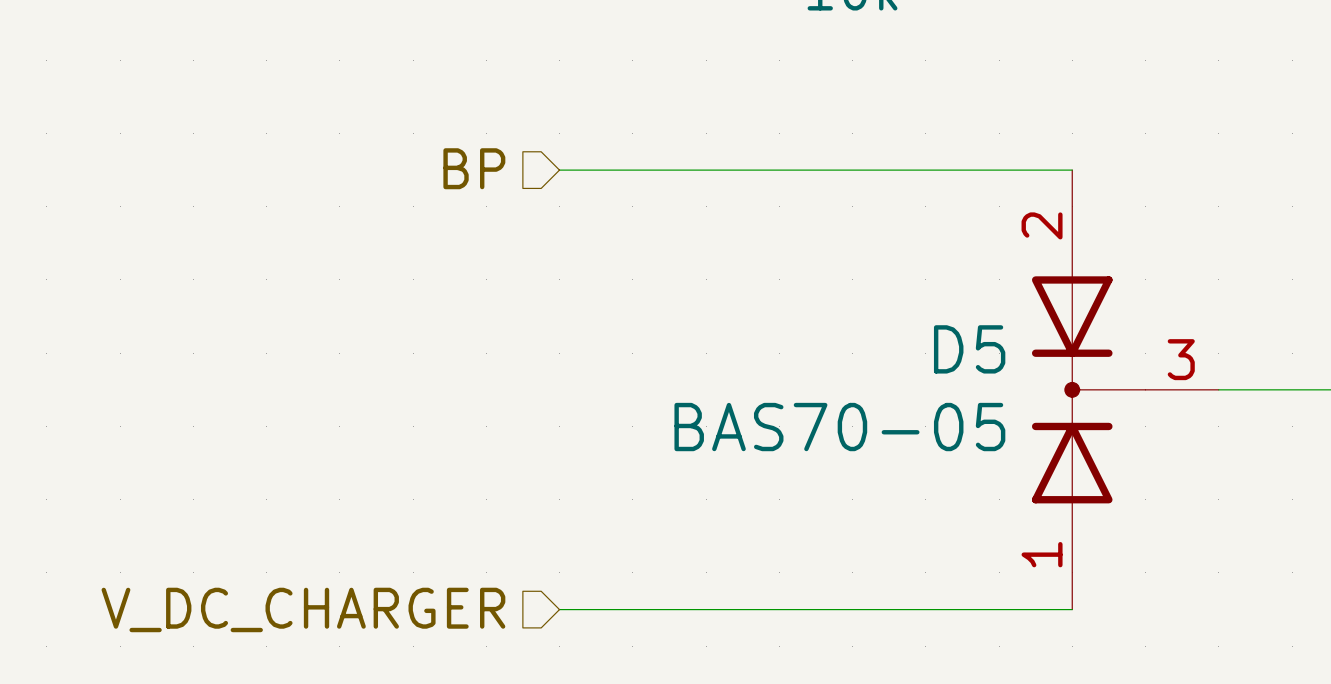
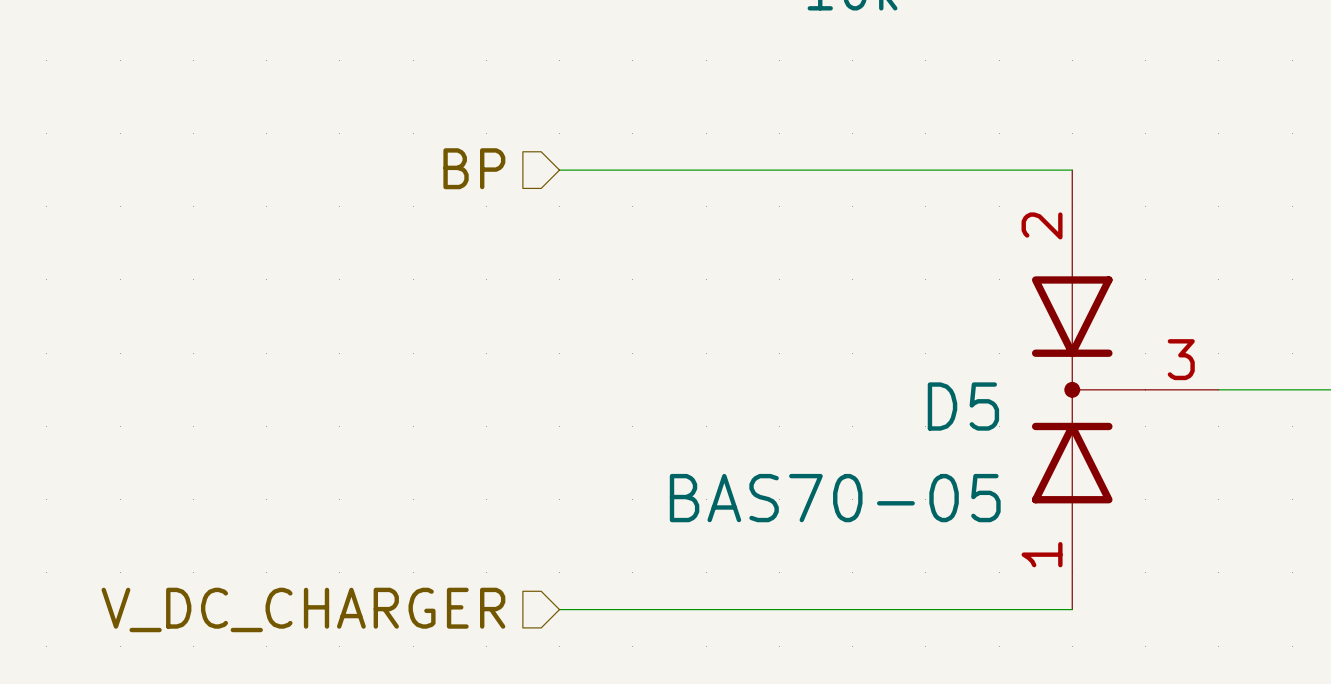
D5 name position: D5 (969, 349) -> D5 (963, 406)
D5 value position: BAS70-05 (839, 427) -> BAS70-05 (835, 498)

